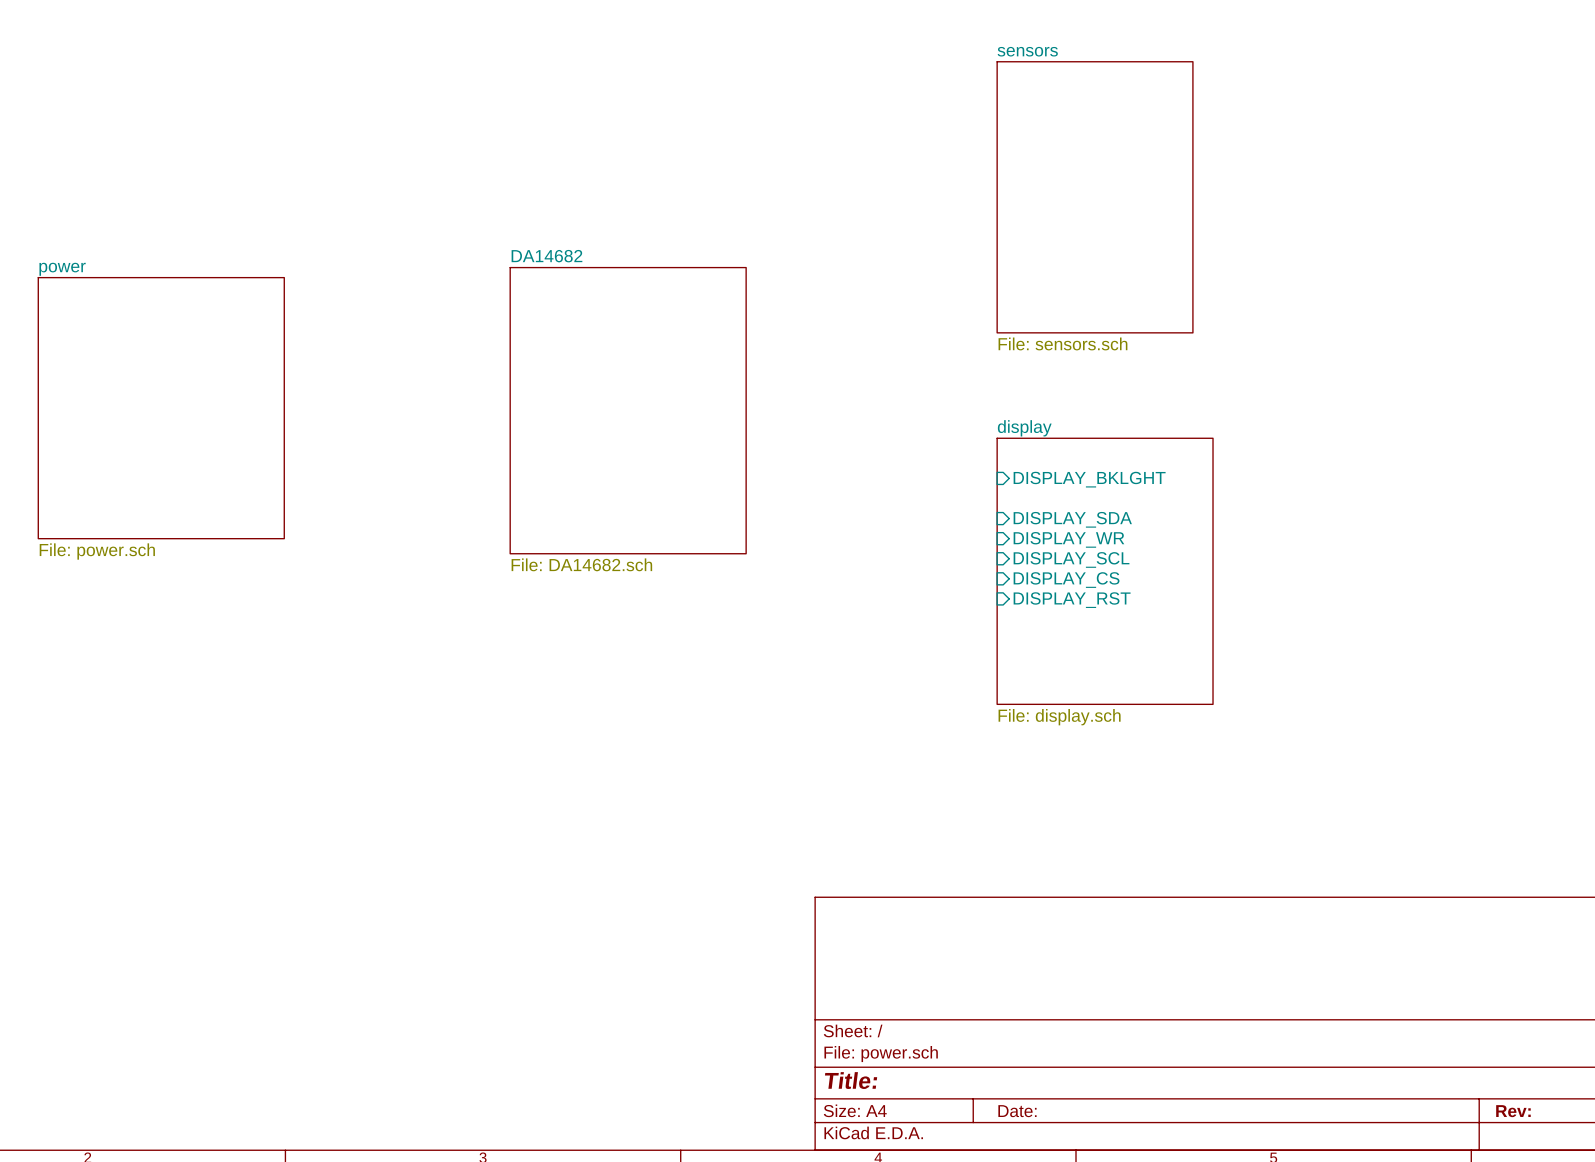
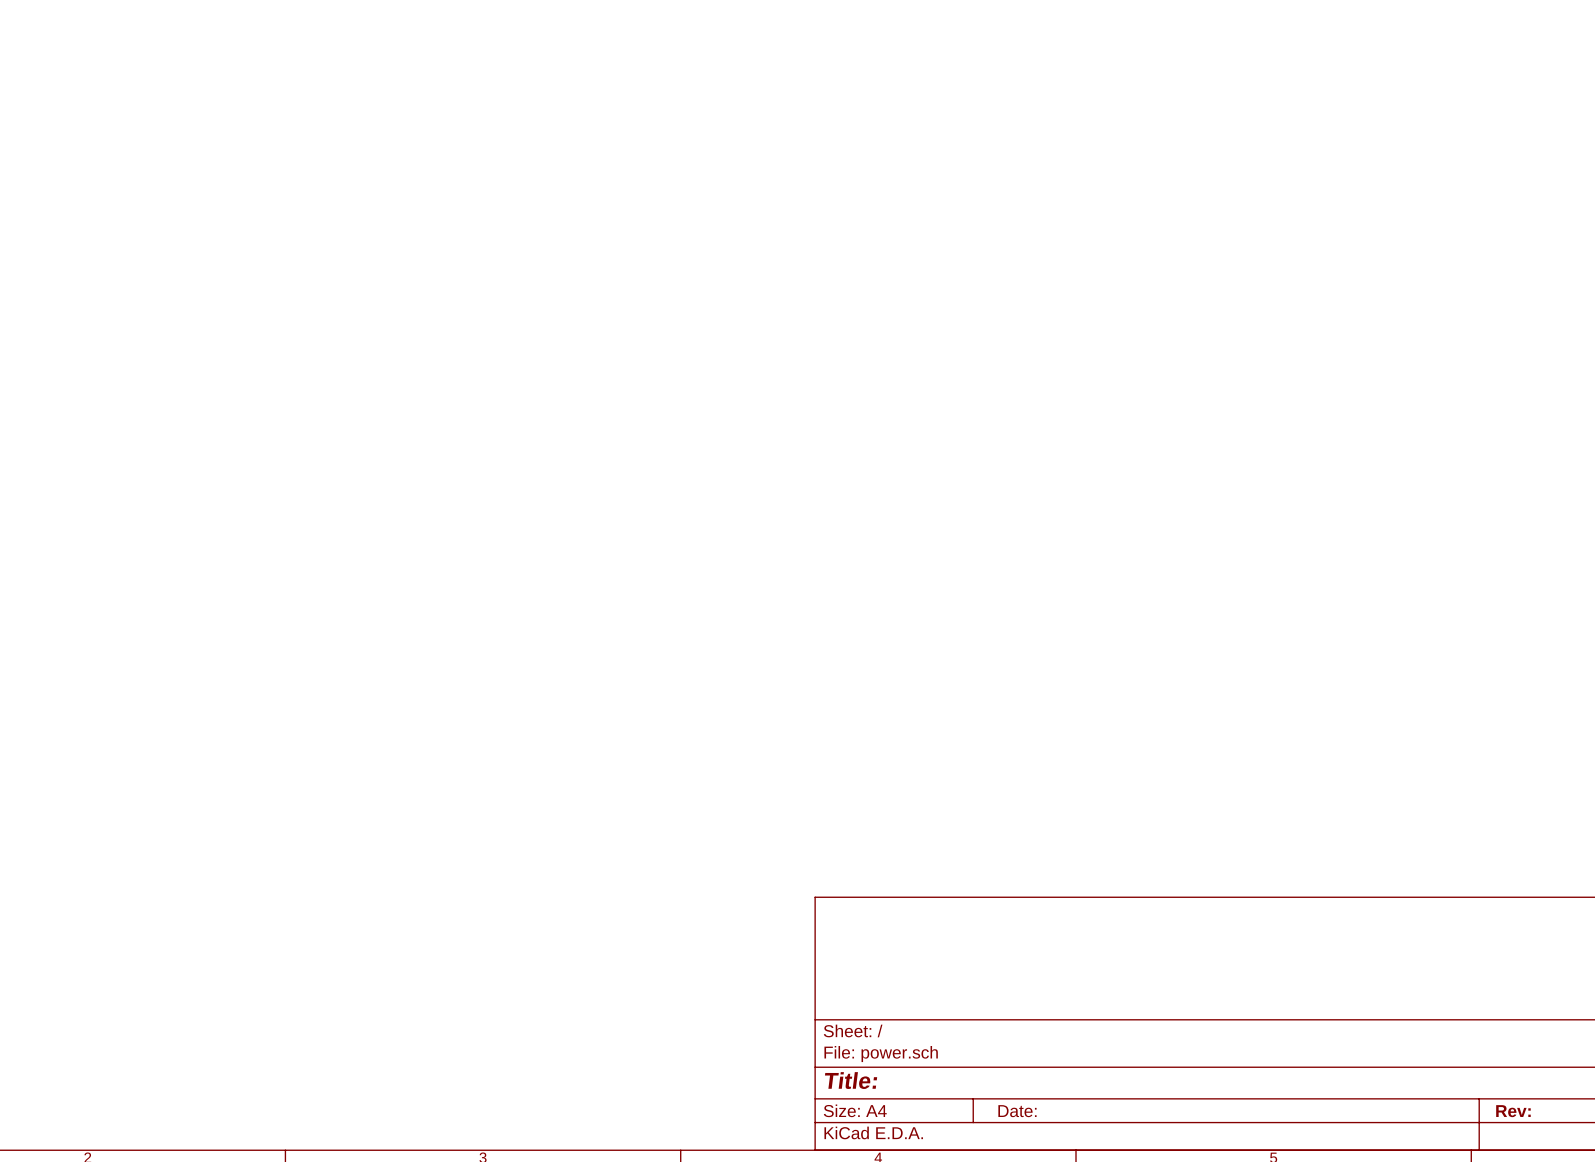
sheet sensors: File: sensors.sch (1095, 197) -> none
sheet power: File: power.sch (161, 408) -> none
sheet DA14682: File: DA14682.sch (628, 410) -> none
sheet pin: DISPLAY_BKLGHT (1089, 479) -> none
sheet pin: DISPLAY_SDA (1072, 519) -> none
sheet pin: DISPLAY_WR (1068, 539) -> none
sheet pin: DISPLAY_SCL (1071, 559) -> none
sheet display: File: display.sch (1105, 571) -> none
sheet pin: DISPLAY_CS (1066, 580) -> none
sheet pin: DISPLAY_RST (1072, 600) -> none

